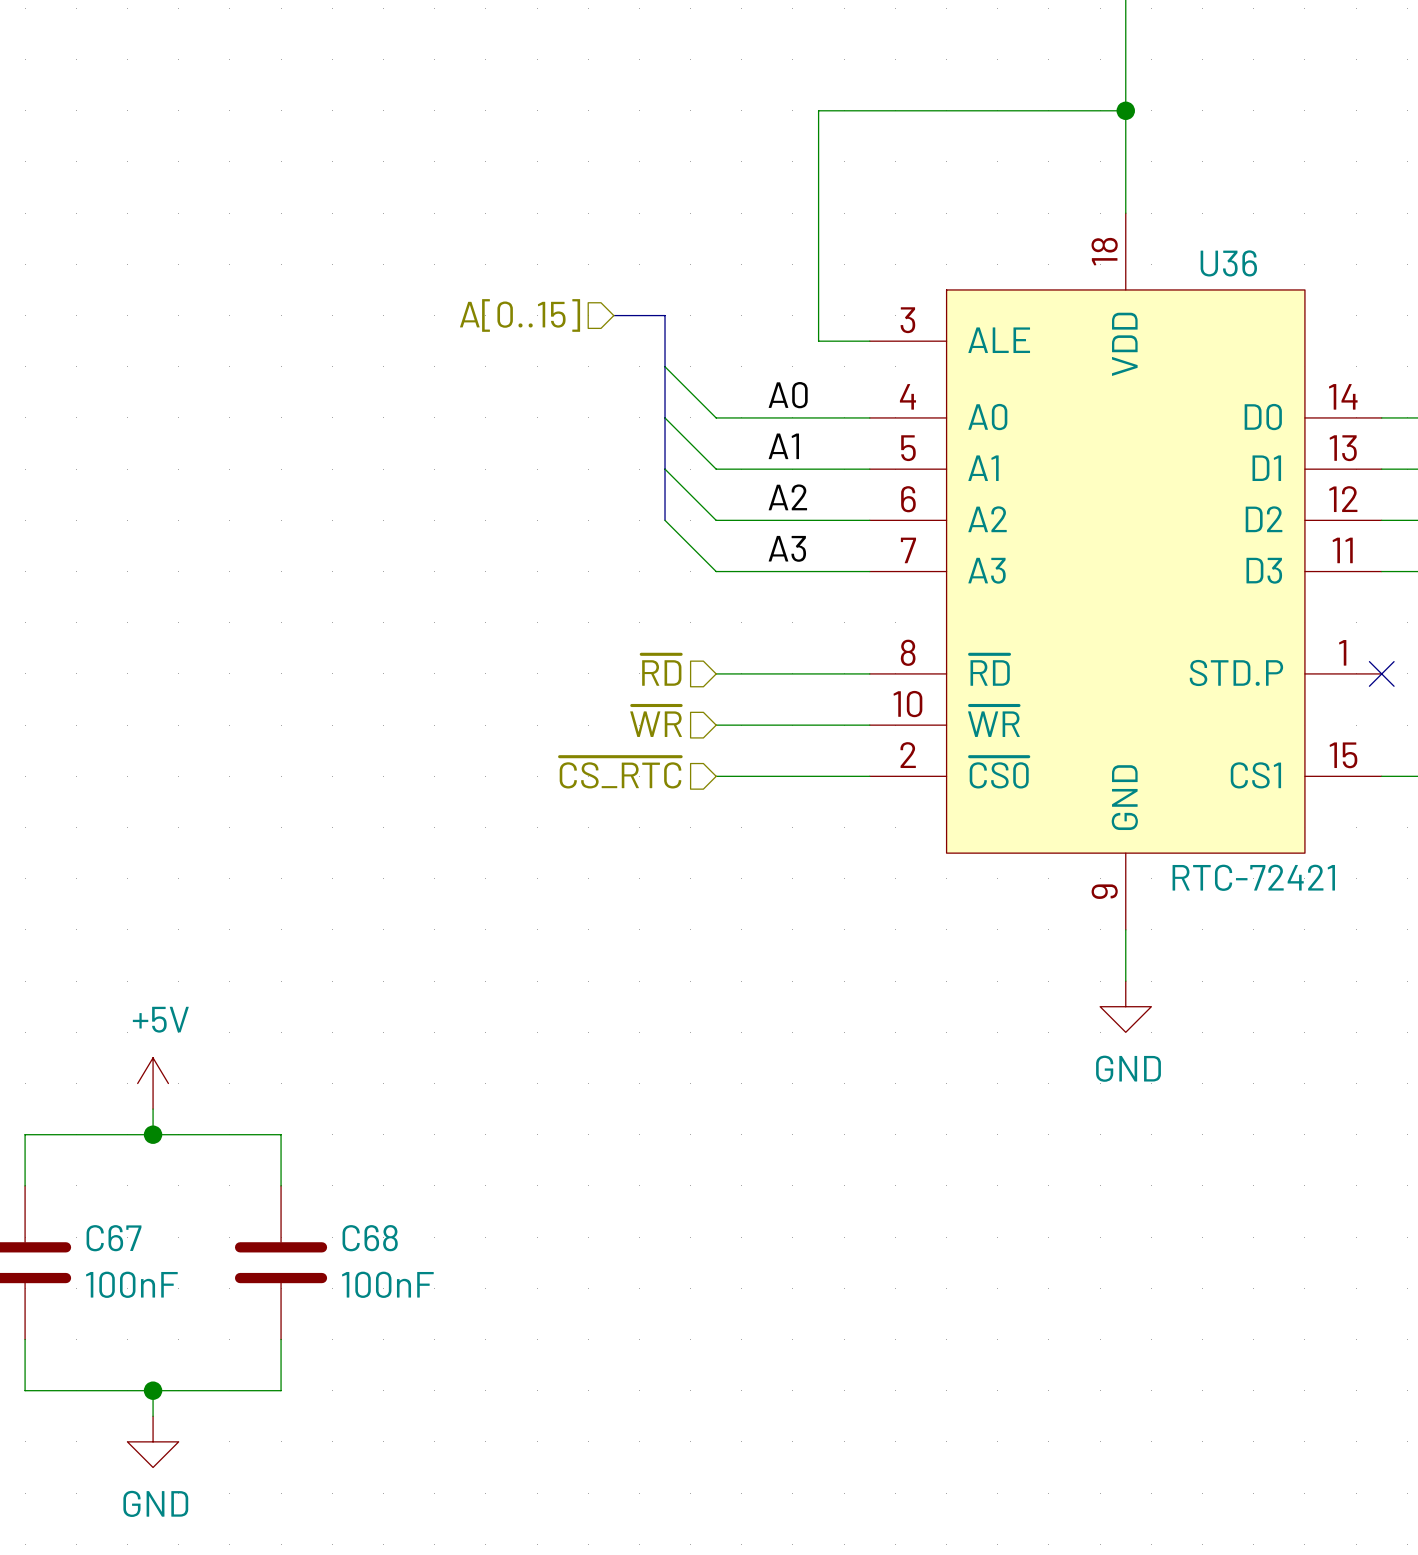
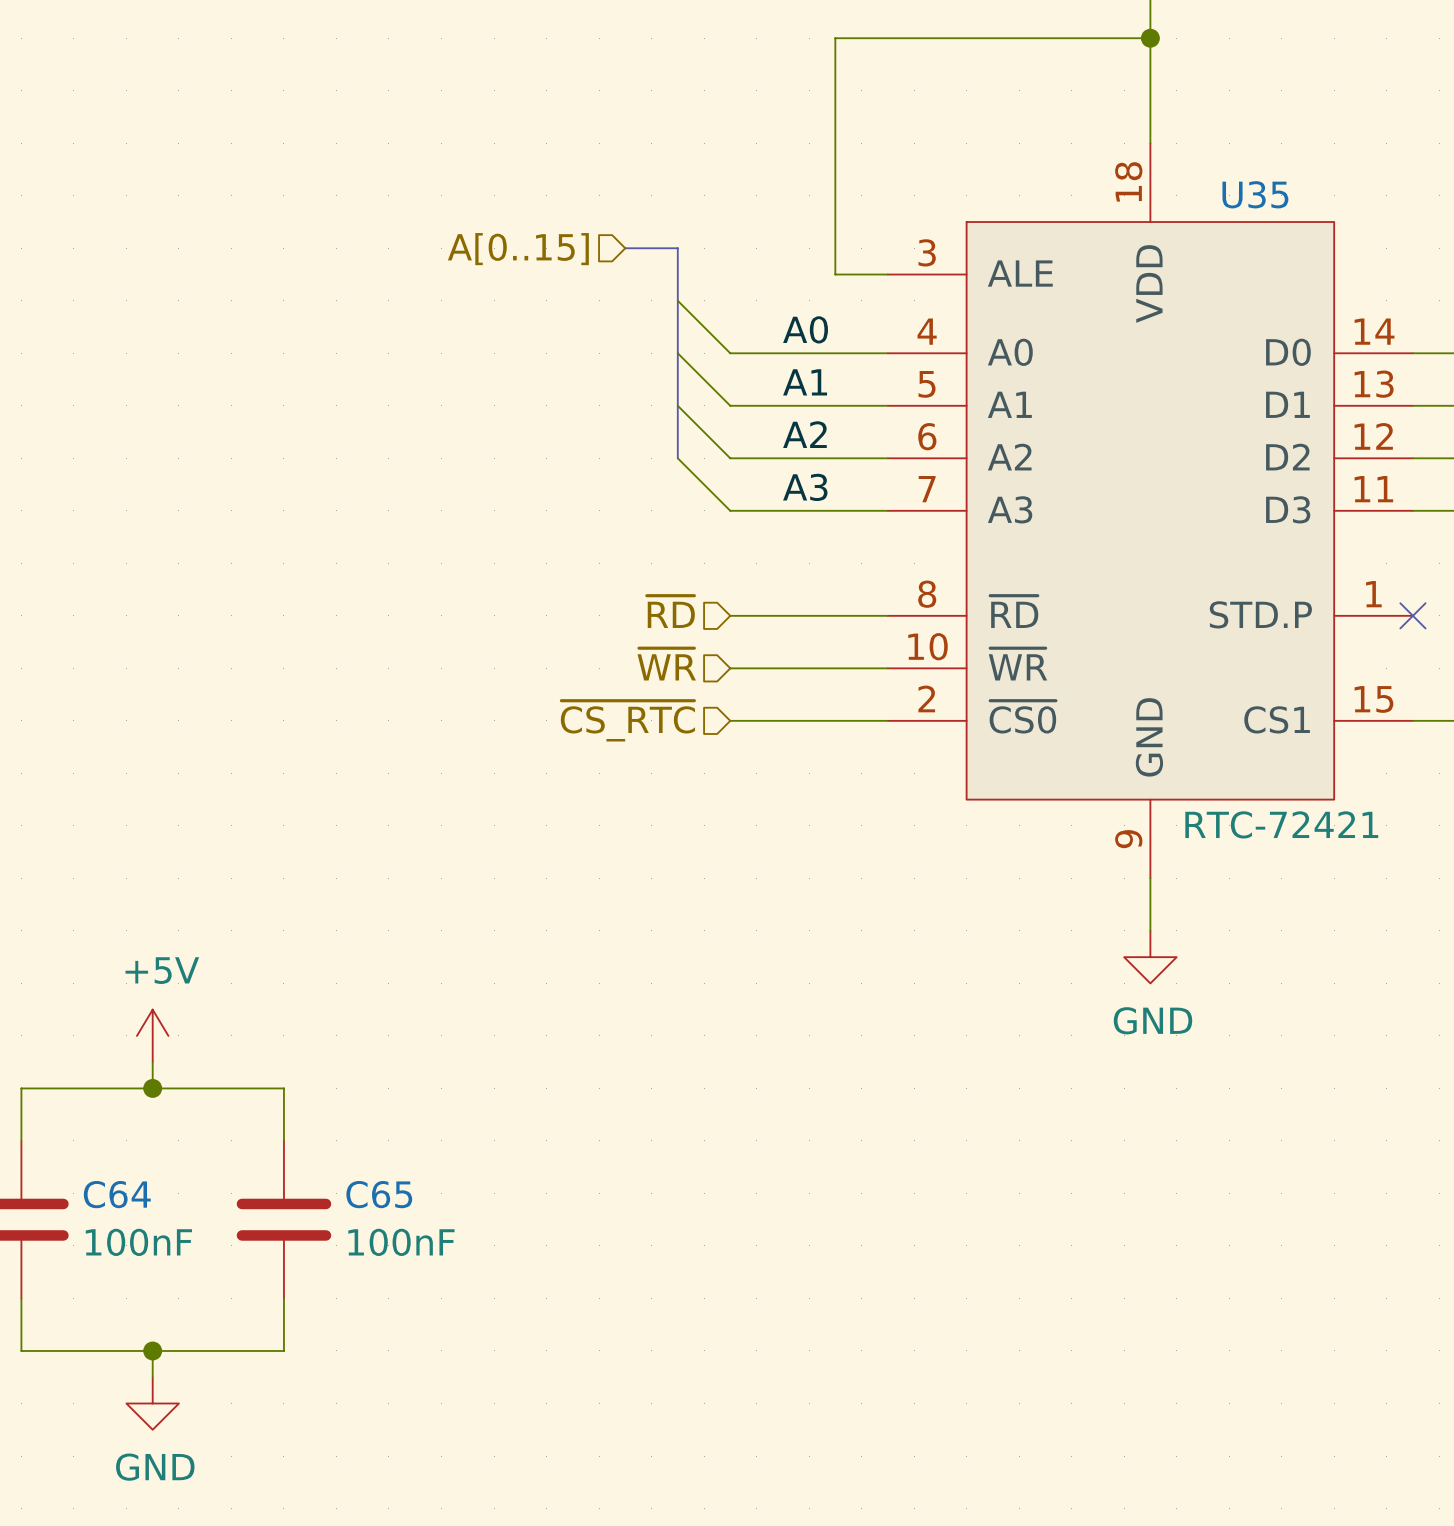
U36 name: U36 (1228, 263) -> U35 (1255, 194)
C67 name: C67 (114, 1238) -> C64 (117, 1194)
C68 name: C68 (370, 1238) -> C65 (379, 1194)

